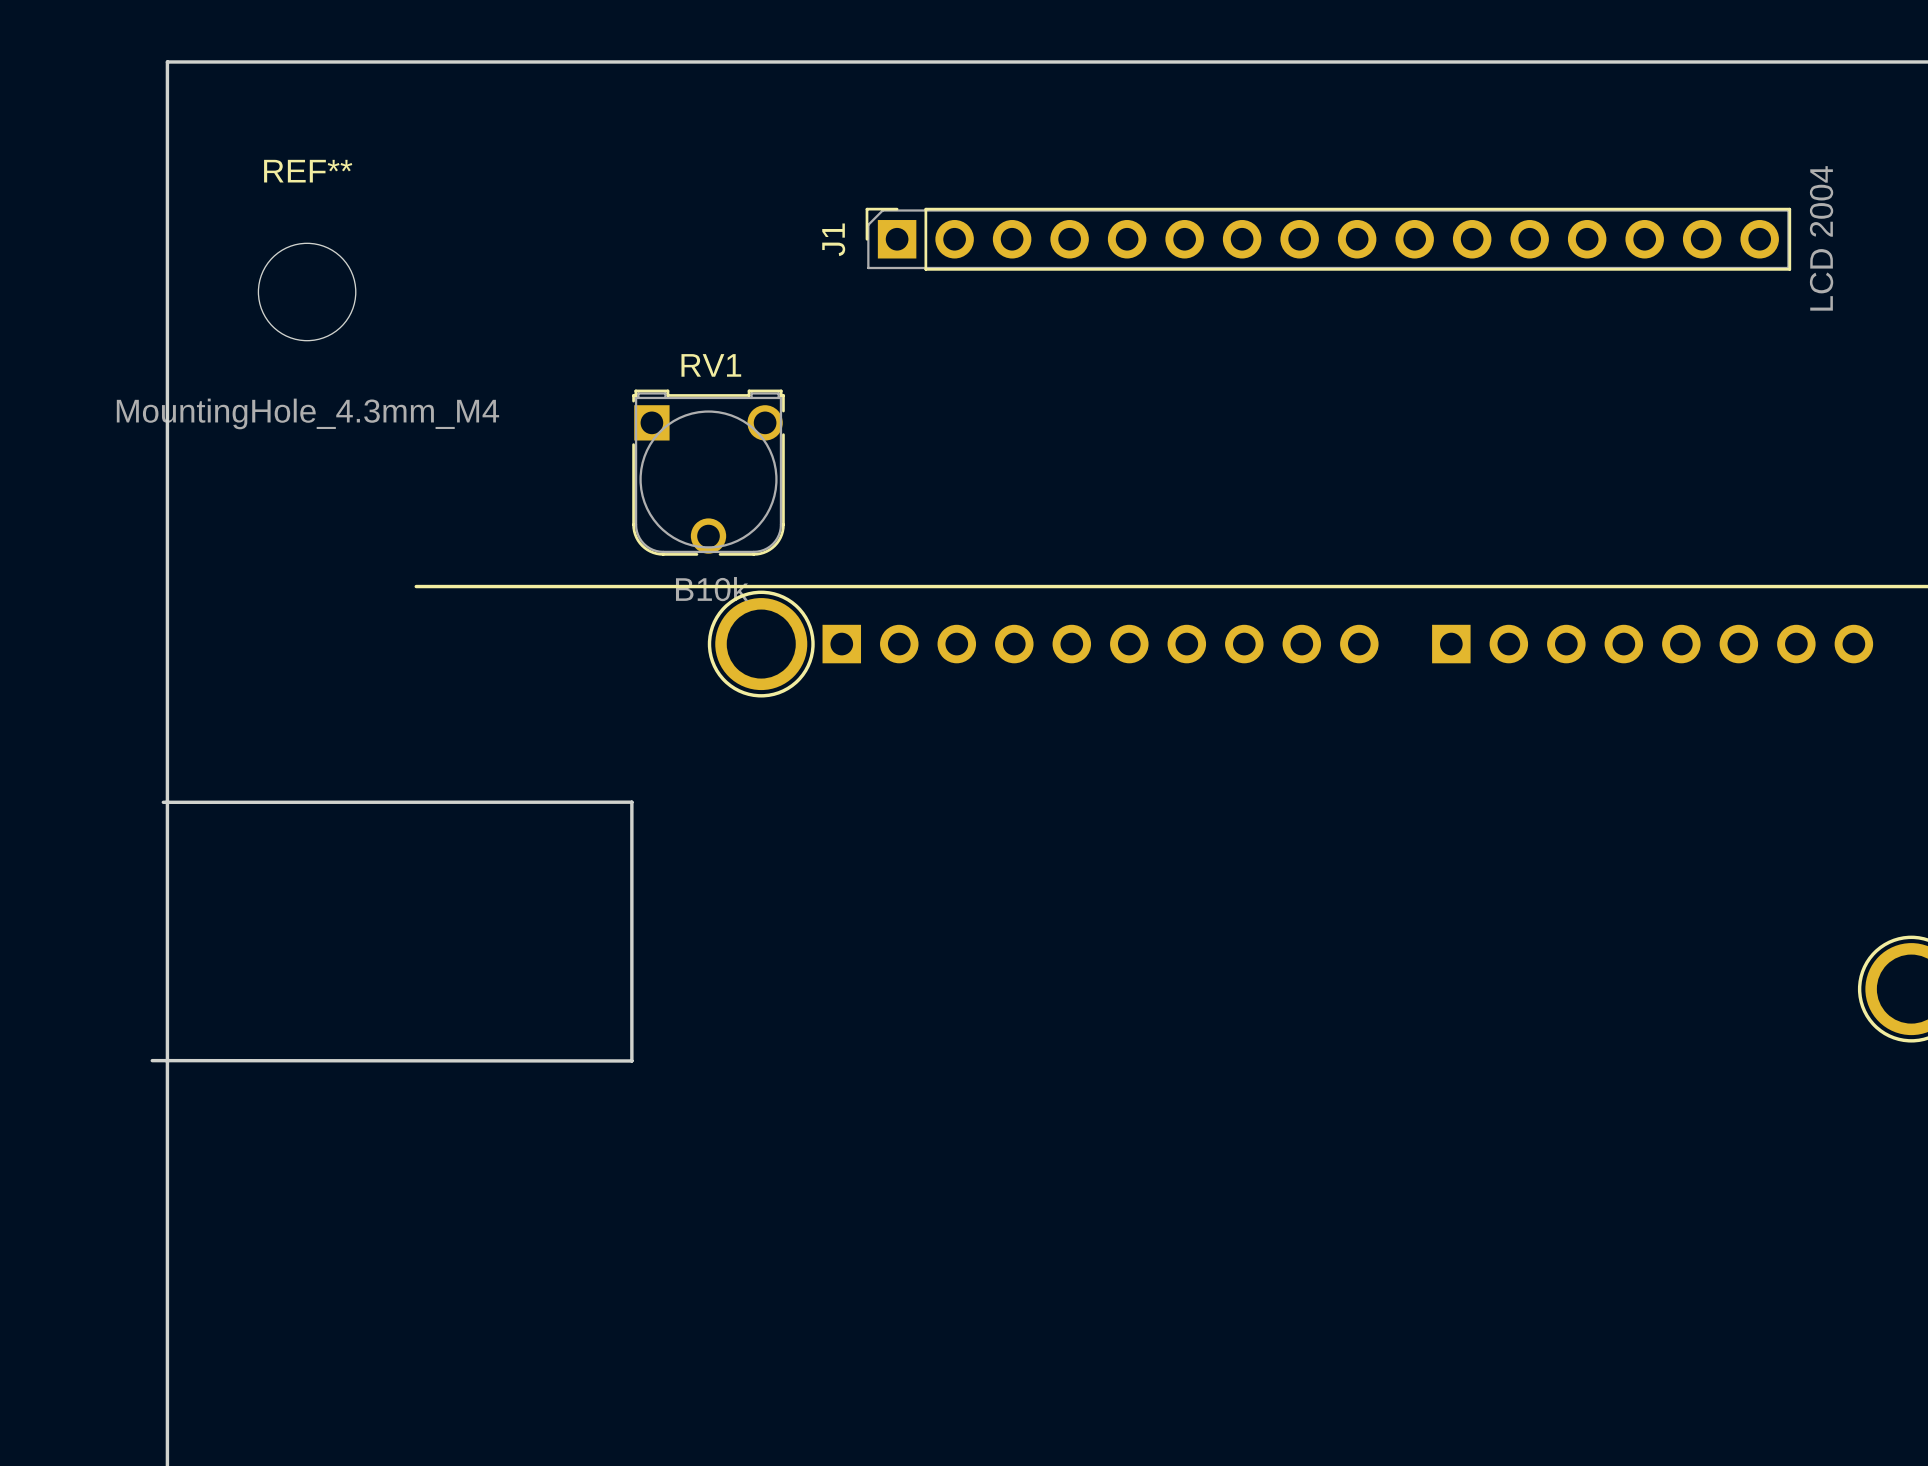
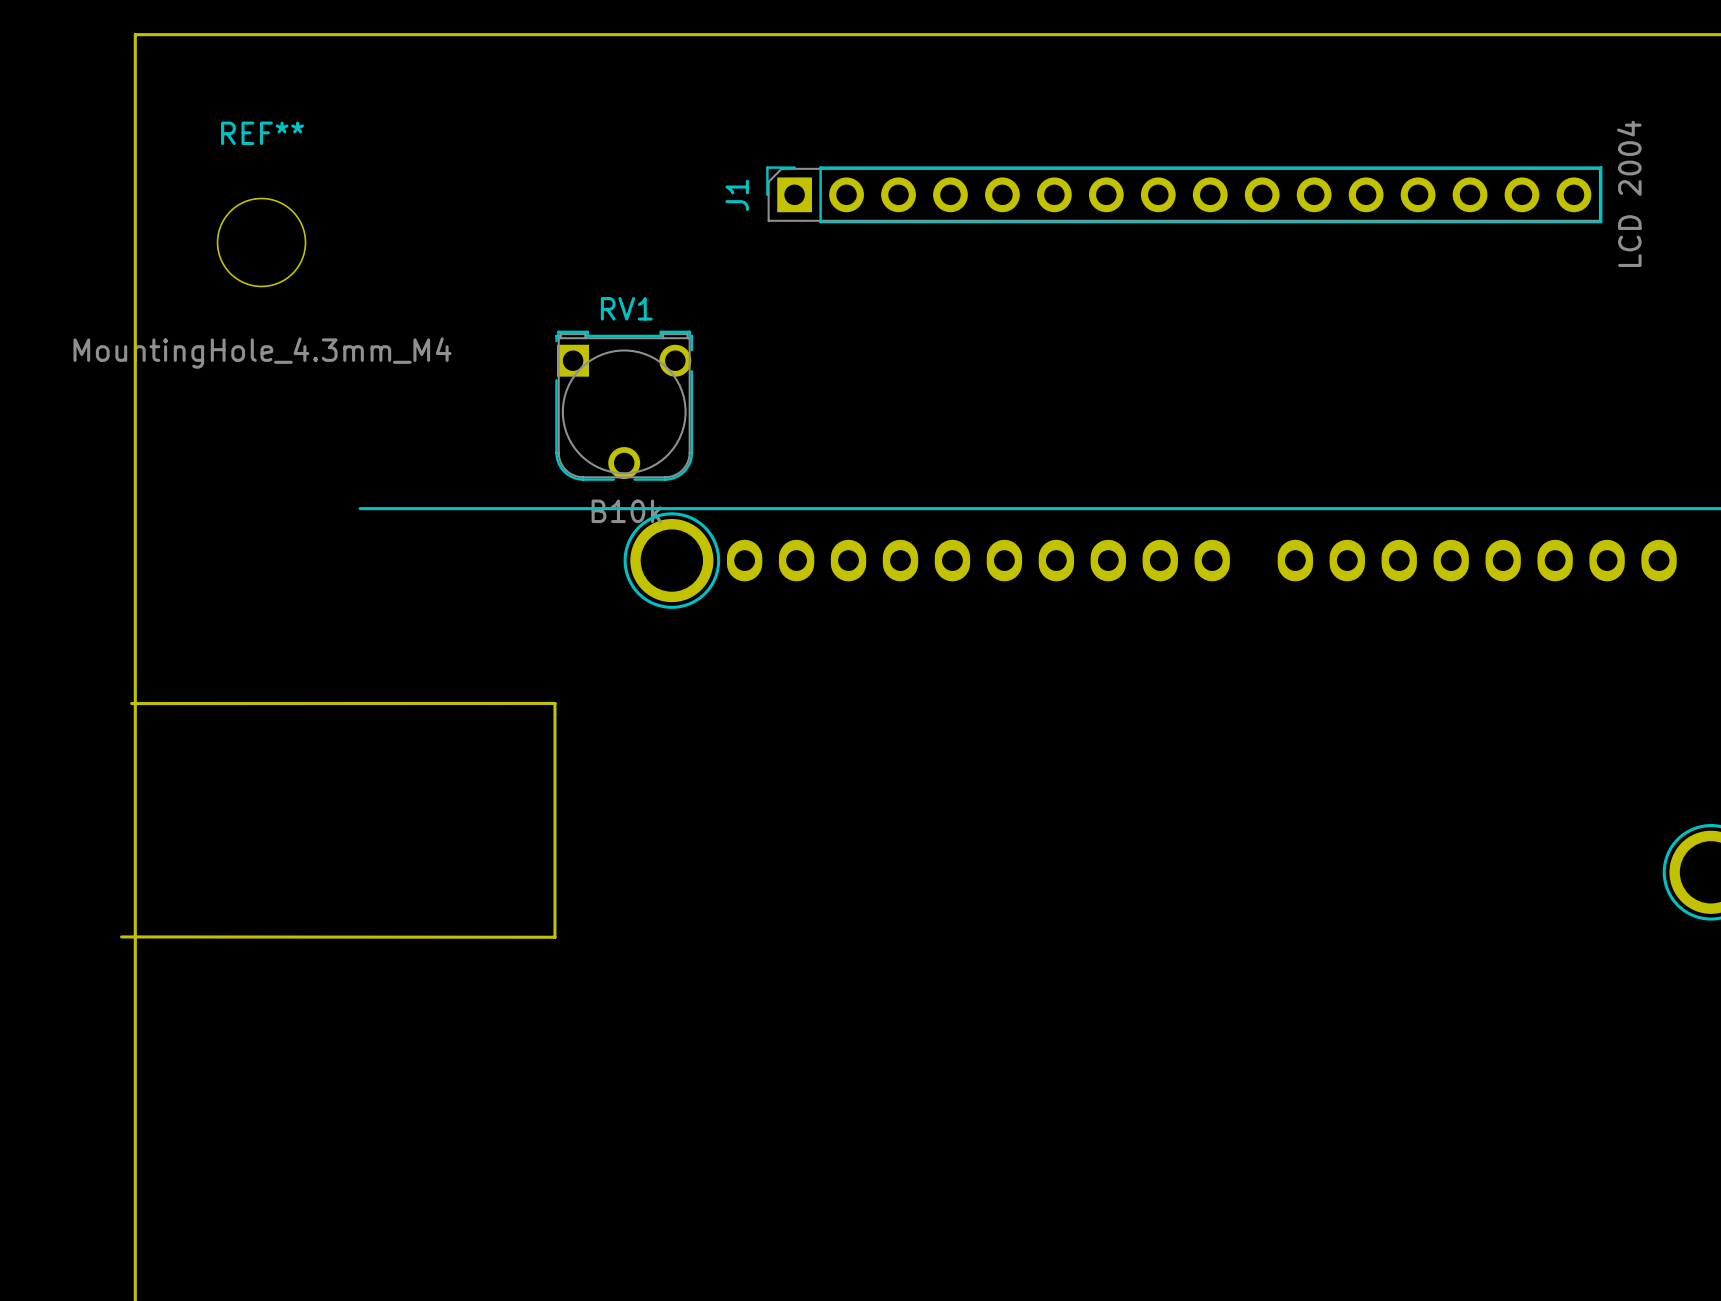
part footprint: [822, 624, 1379, 664] -> [726, 539, 1230, 582]
part footprint: [1432, 624, 1874, 664] -> [1277, 539, 1677, 582]

